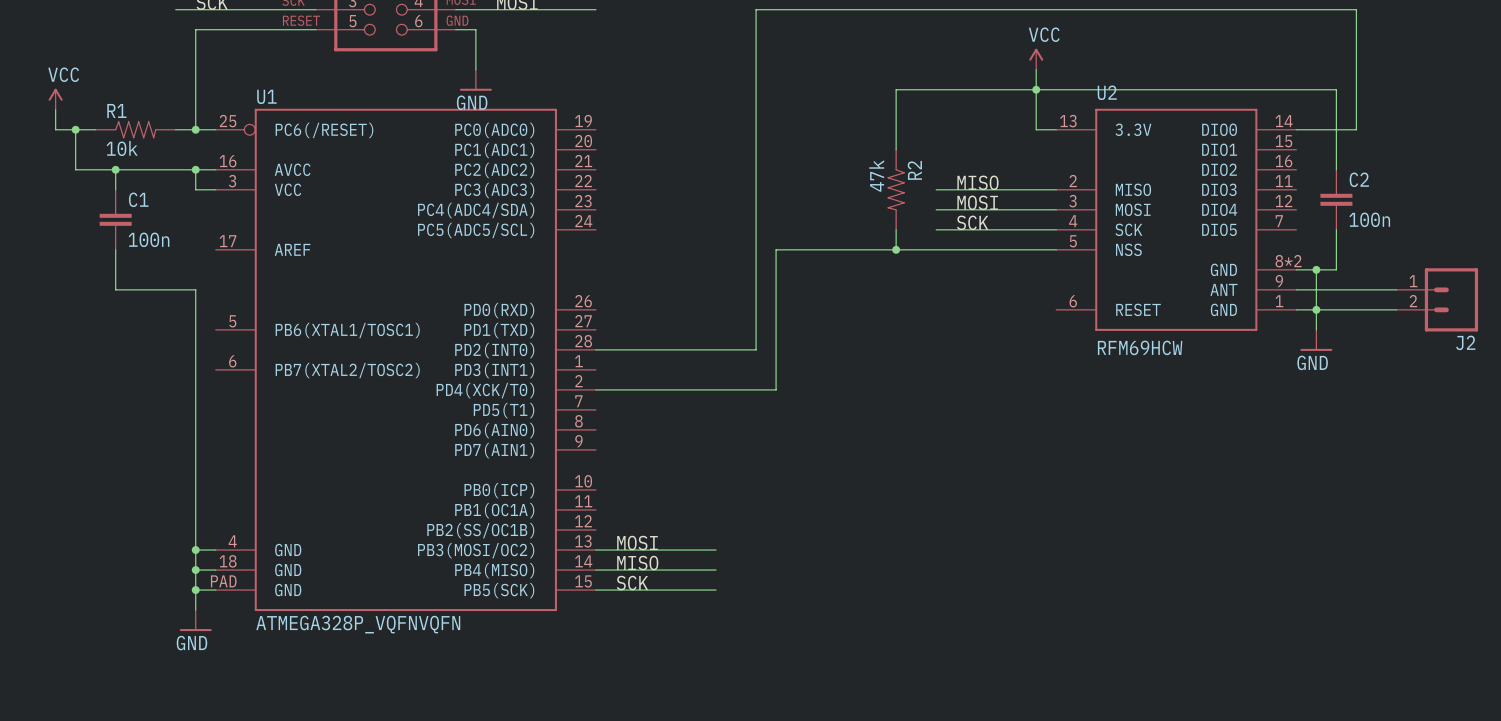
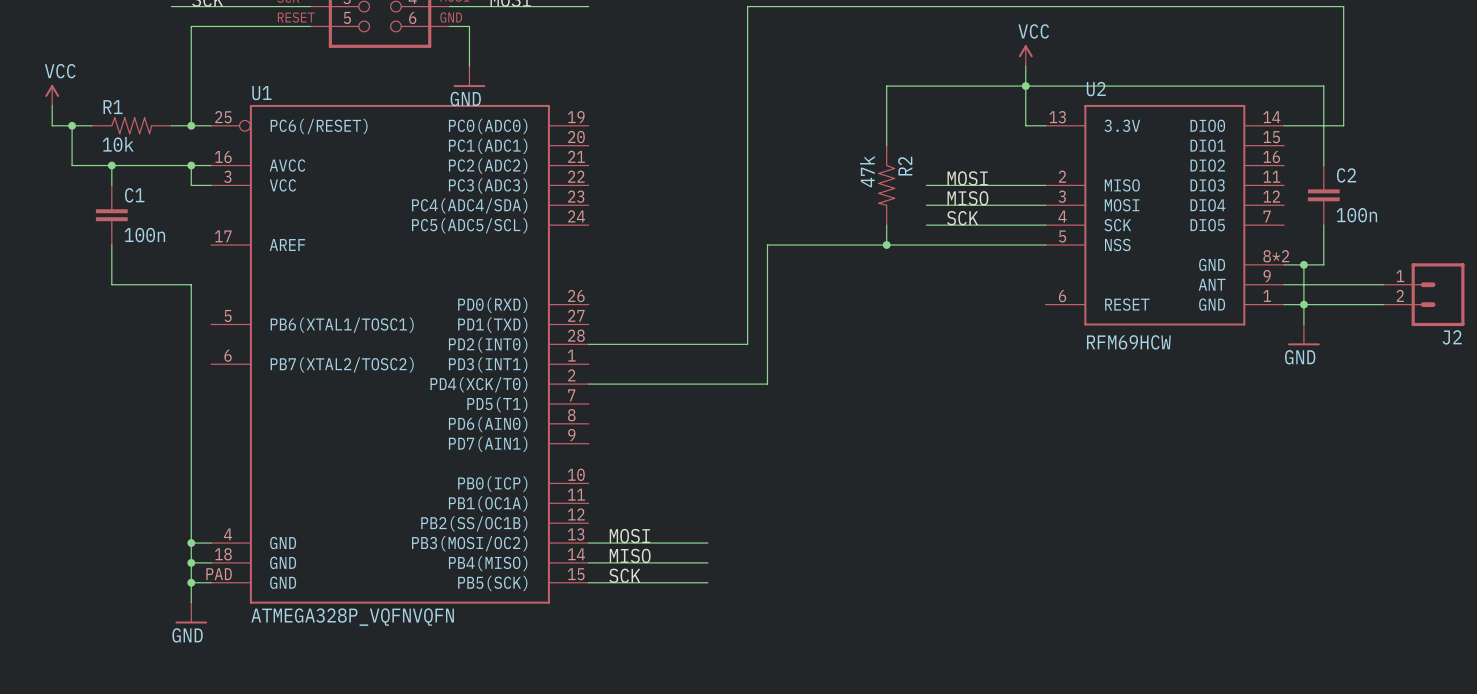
label: MISO (977, 182) -> MOSI (967, 178)
label: MOSI (977, 202) -> MISO (967, 198)

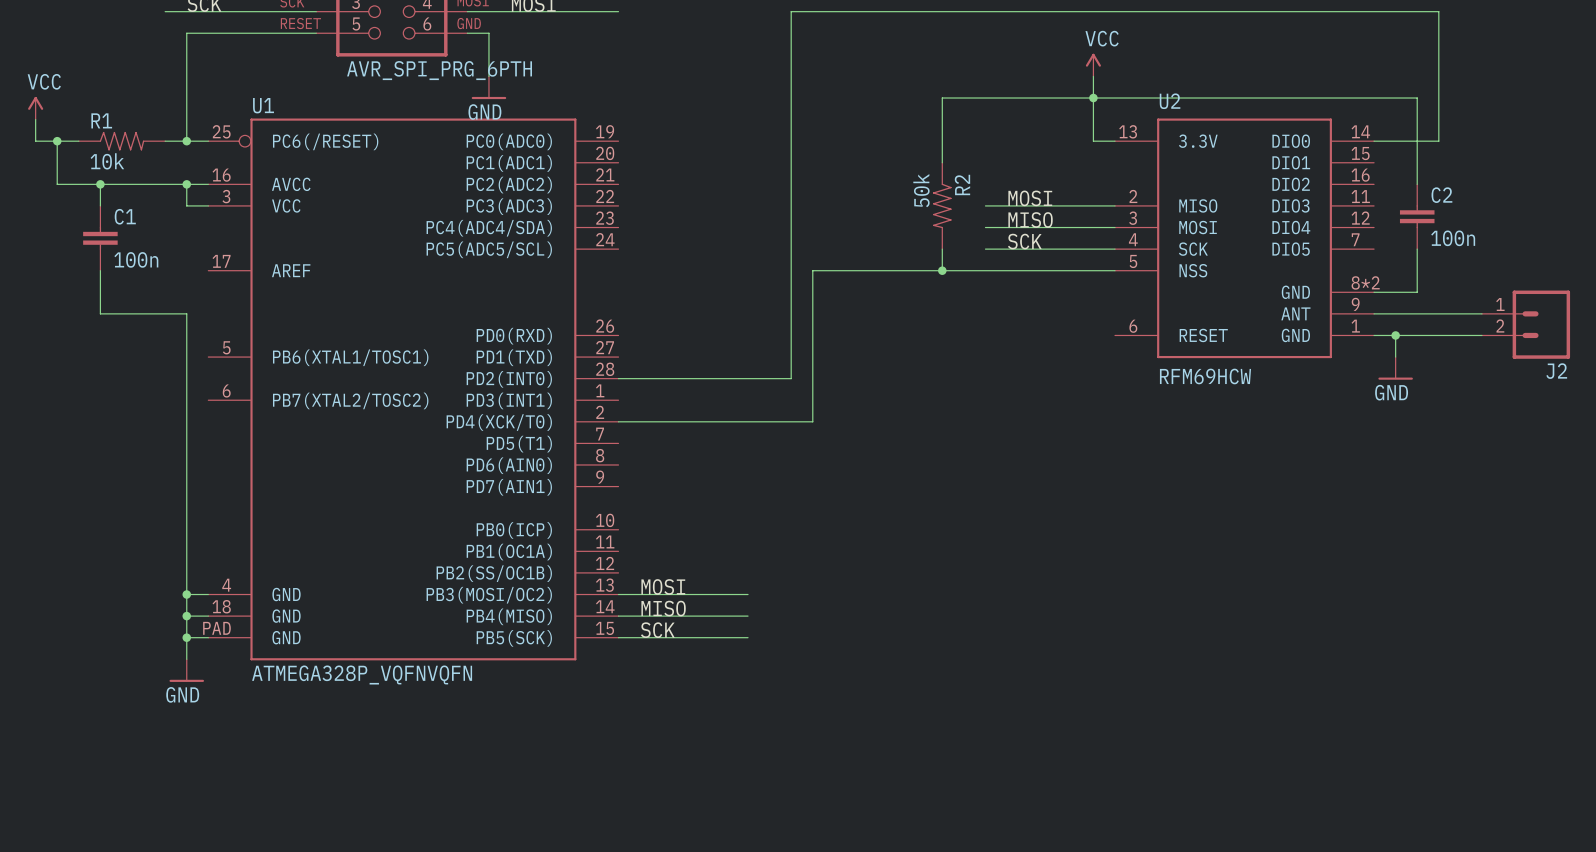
part value: none -> AVR_SPI_PRG_6PTH (439, 70)
R2 value: 47k (867, 171) -> 50k (921, 190)
wire: (1303, 264) (1303, 304) -> none
junction: (1303, 264) -> none

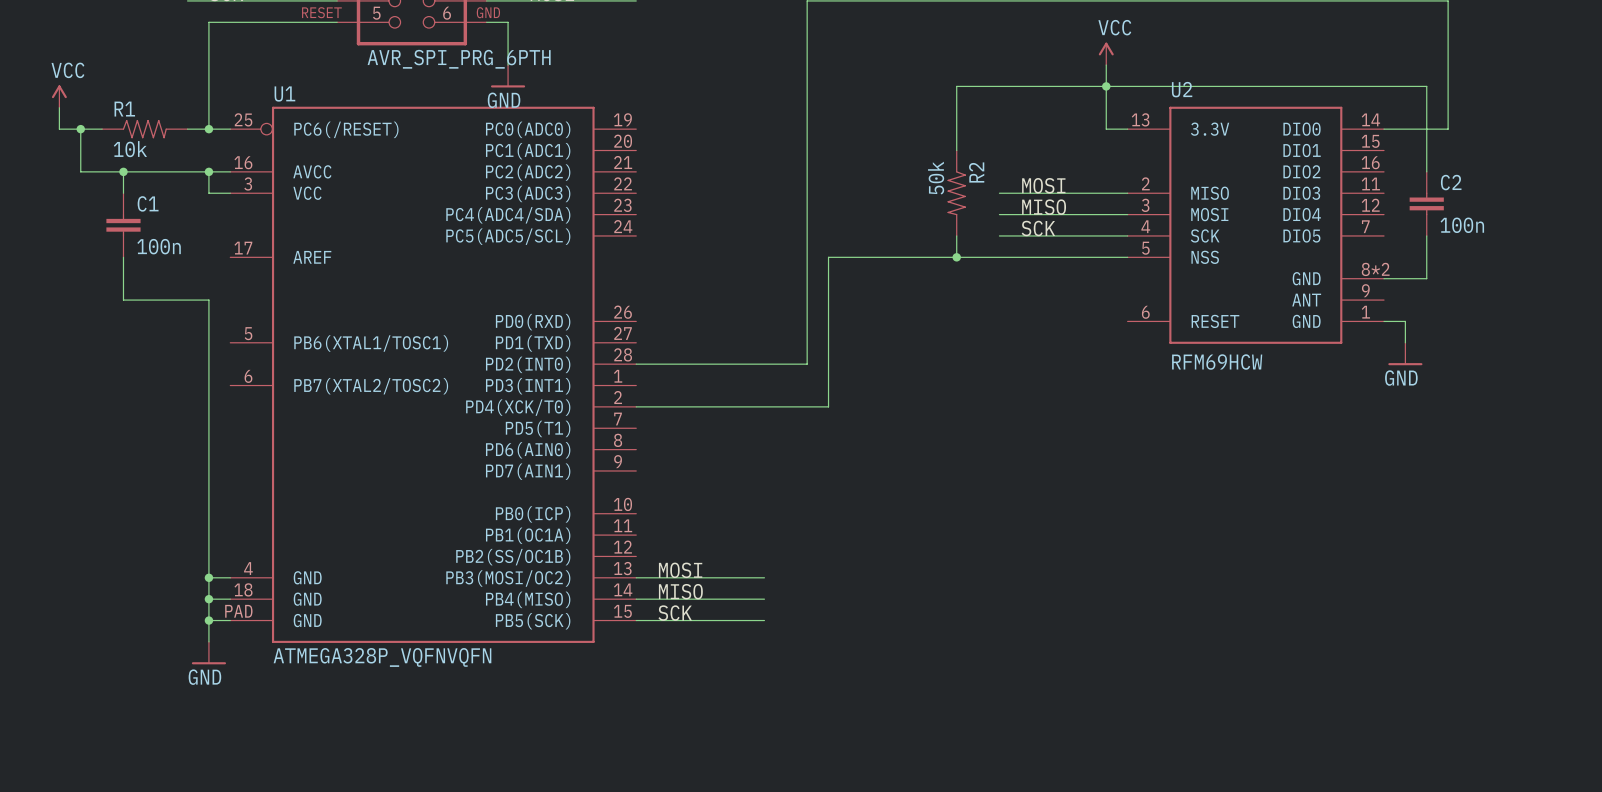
wire: (1374, 313) (1481, 313) -> none
J2: (1526, 324) -> none
wire: (1395, 335) (1481, 335) -> none
junction: (1395, 335) -> none

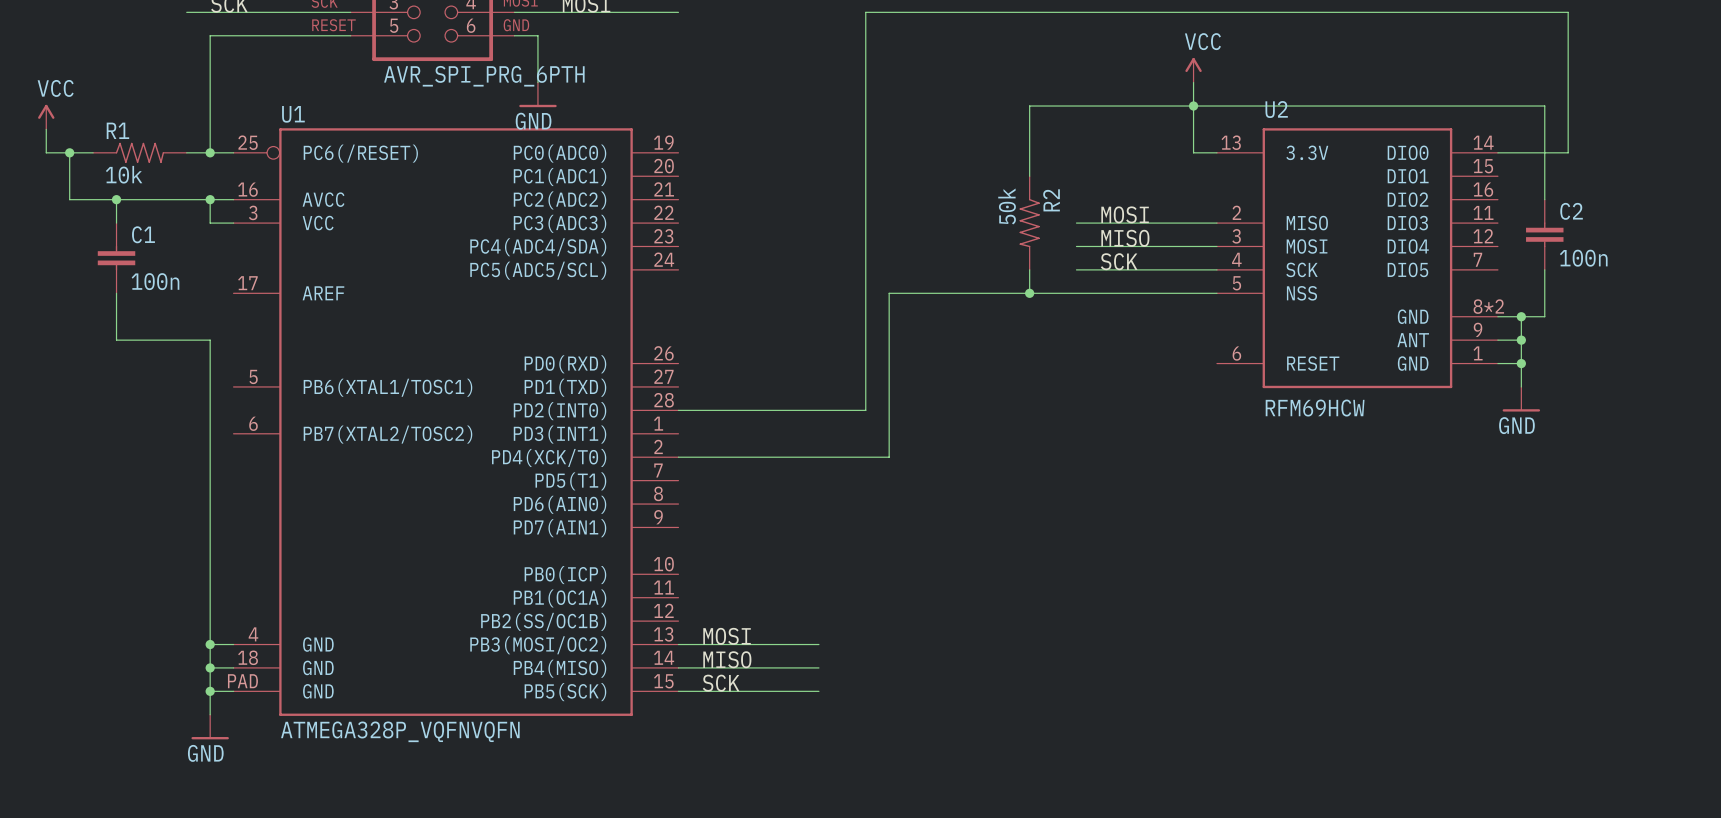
wire: none -> (1521, 316) (1521, 363)
junction: none -> (1521, 316)
wire: none -> (1497, 340) (1521, 340)
junction: none -> (1521, 340)
junction: none -> (1521, 363)

